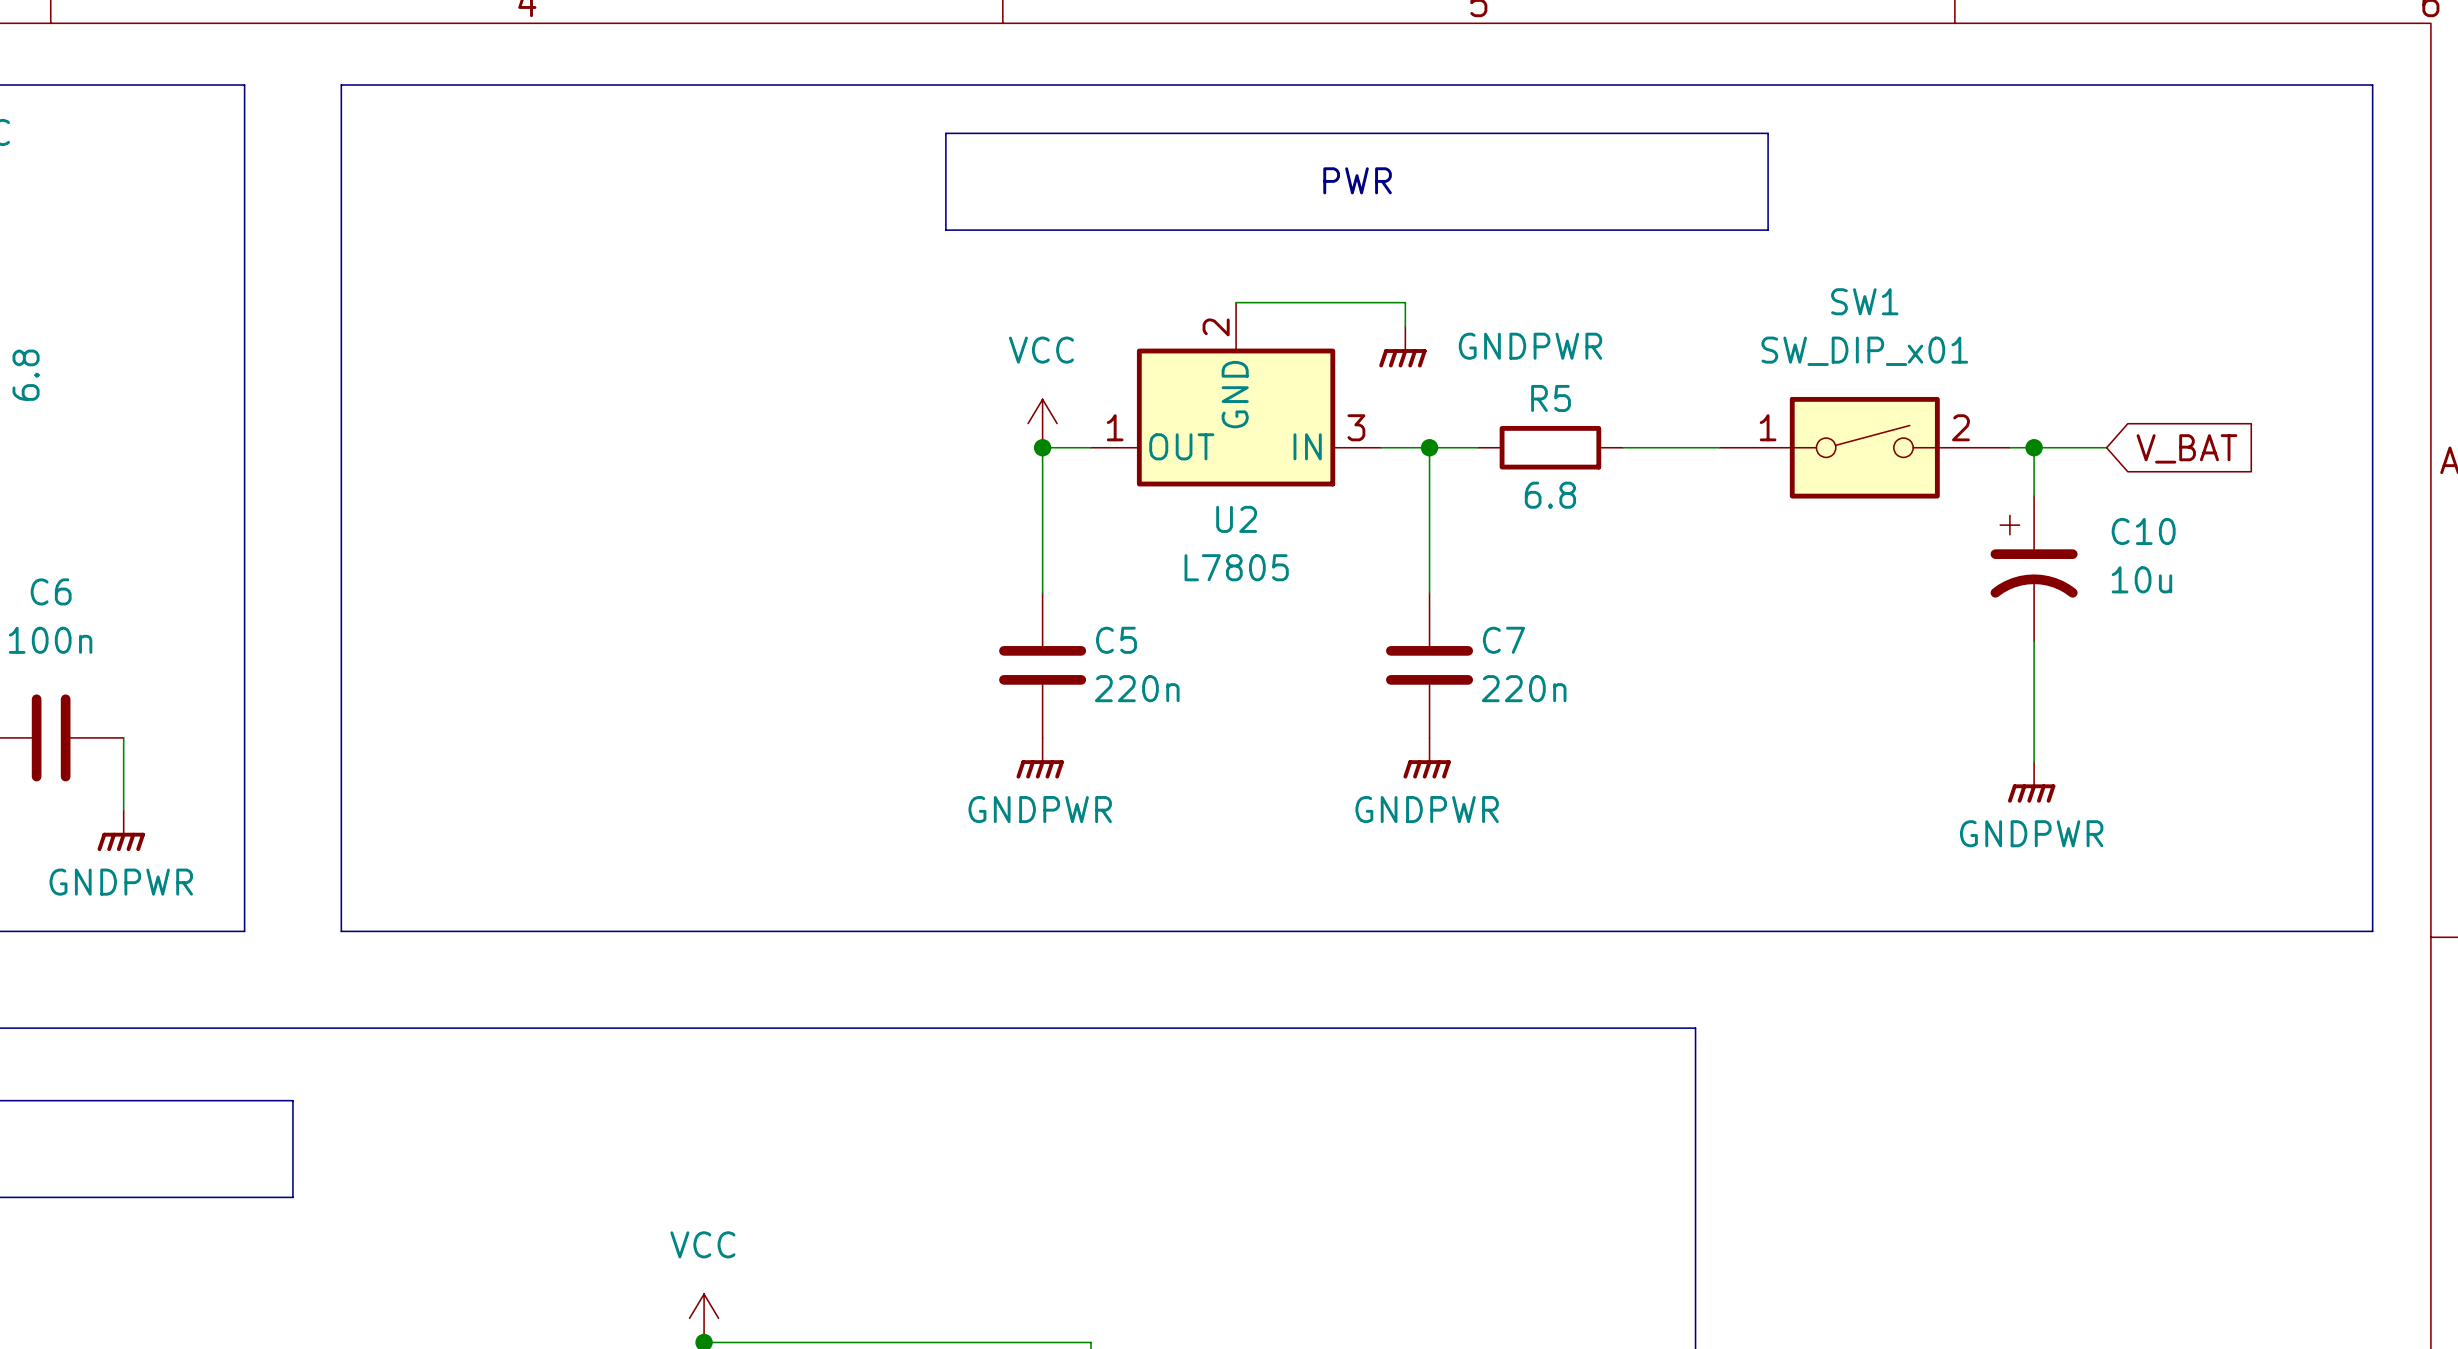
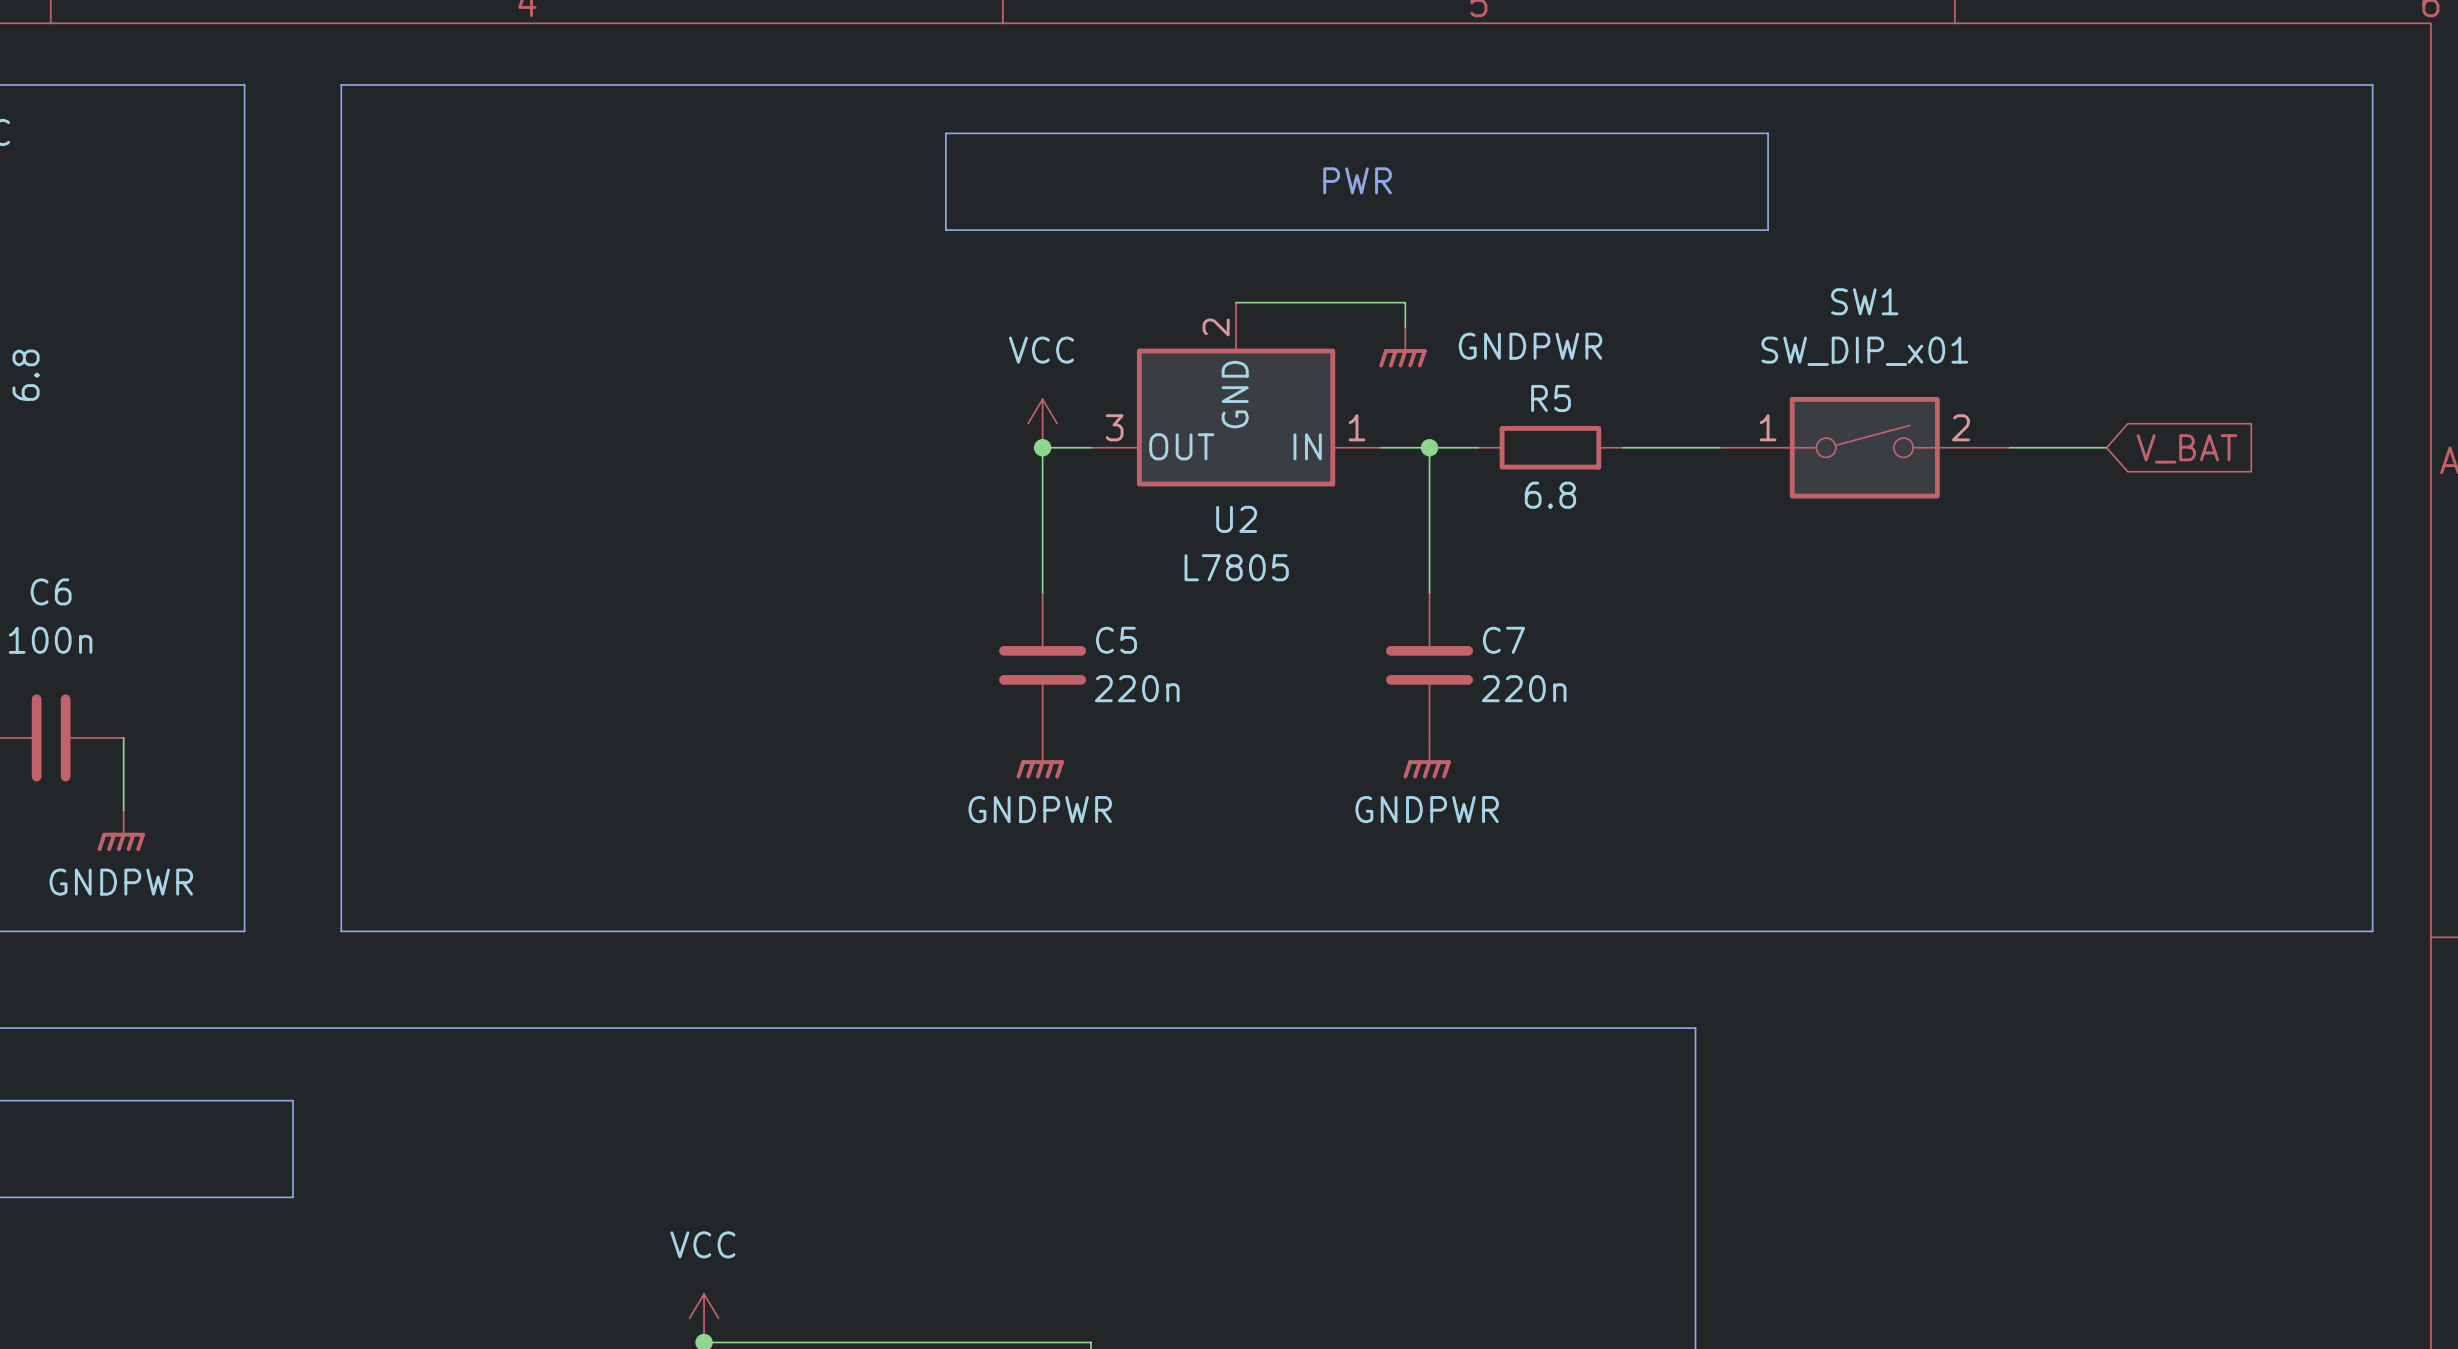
U2 pin number: 1 (1115, 427) -> 3 (1114, 427)
U2 pin number: 3 (1356, 427) -> 1 (1356, 427)
wire: (2034, 447) (2034, 496) -> none
junction: (2034, 447) -> none
C10: 10u (2034, 568) -> none
wire: (2034, 641) (2034, 762) -> none
power symbol: GNDPWR (2031, 782) -> none

